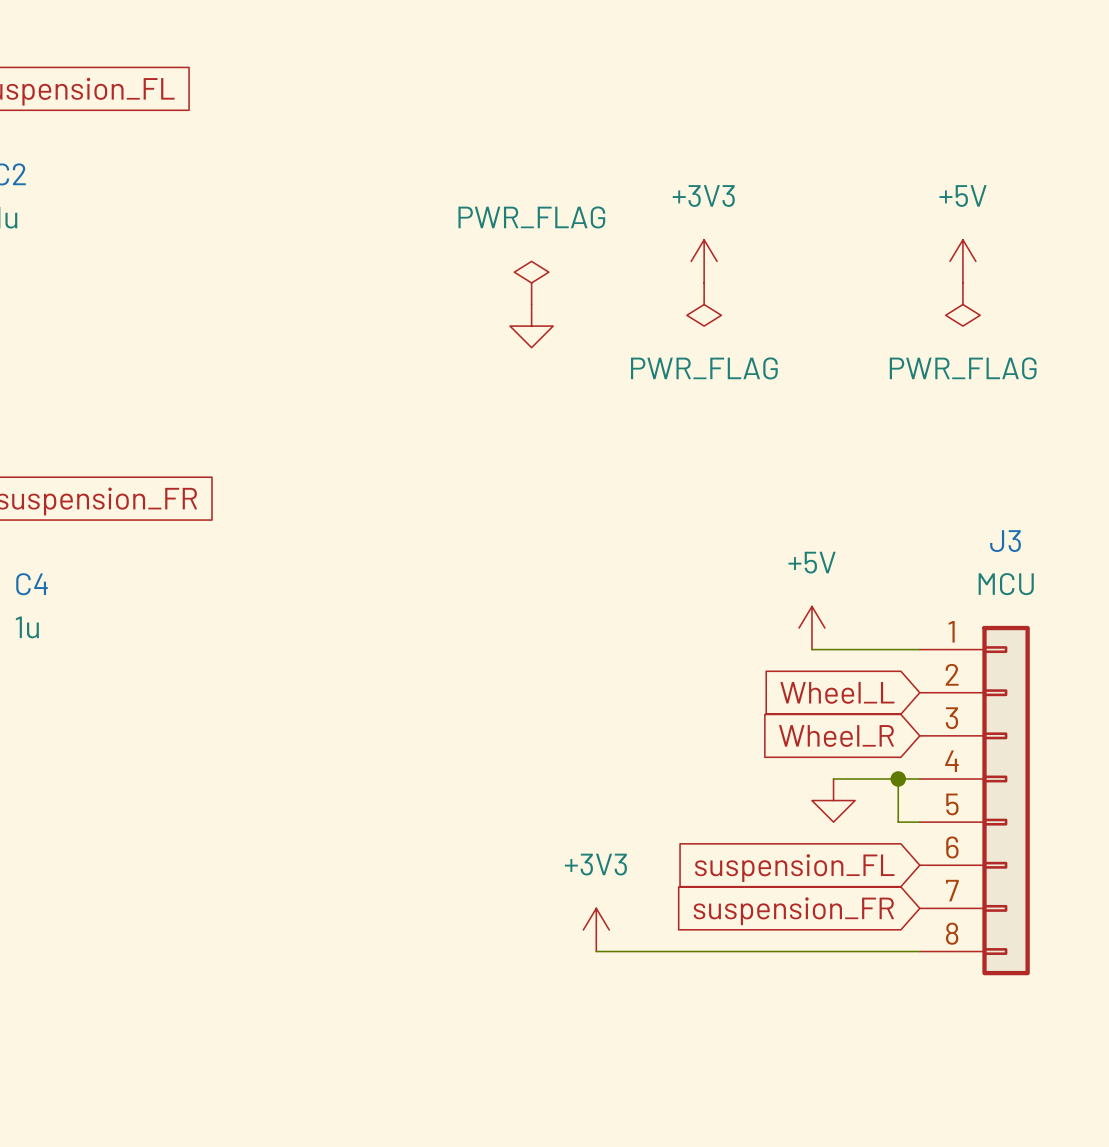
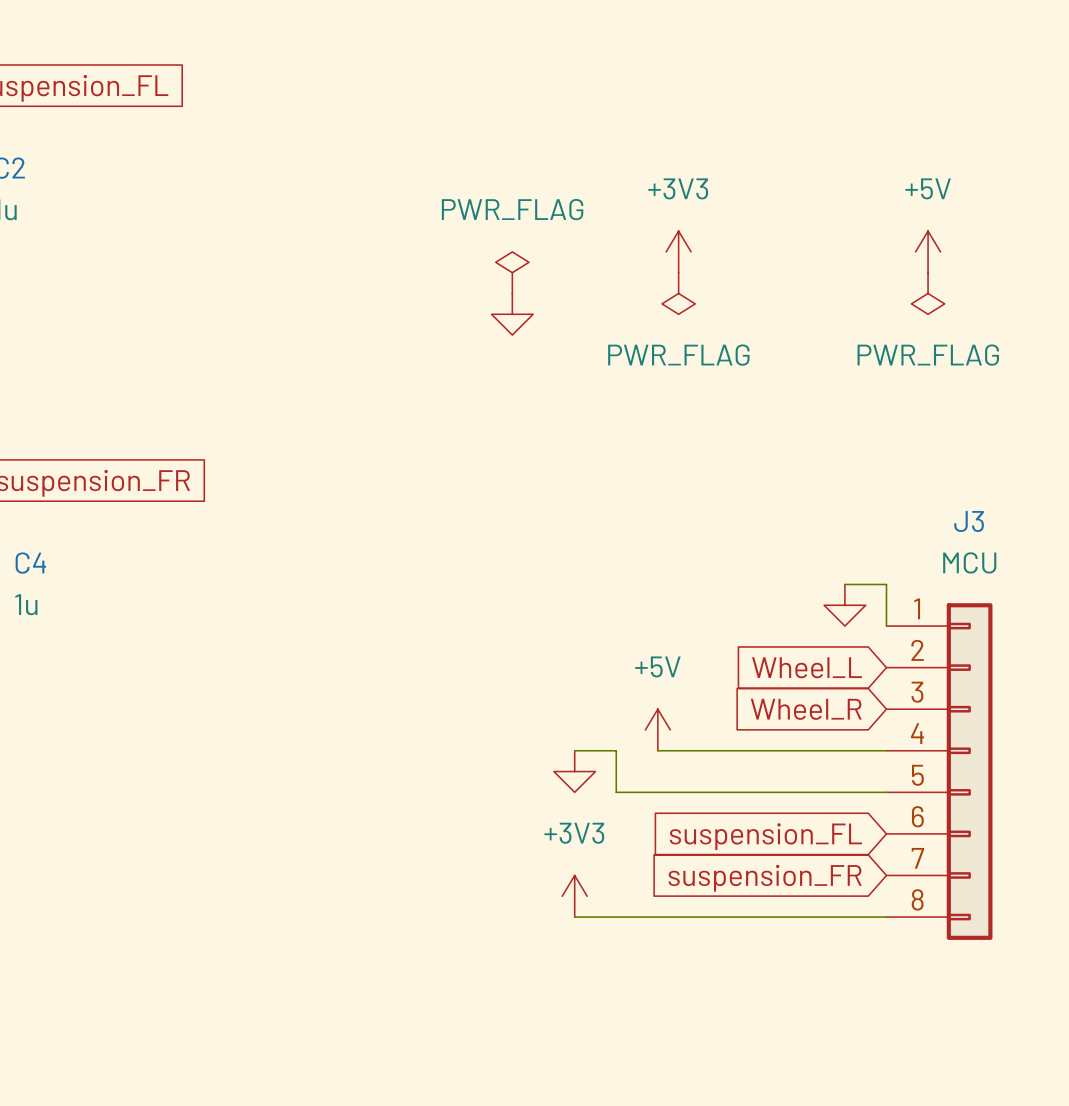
power symbol position: +5V (811, 628) -> +5V (657, 729)
power symbol: none -> (844, 605)
wire: (811, 649) (919, 649) -> (844, 584) (886, 584) (886, 626)
wire: none -> (657, 750) (803, 750)
wire: (898, 778) (898, 822) -> (574, 750) (616, 750) (616, 792) (865, 792)
junction: (898, 778) -> none
power symbol: none -> (574, 771)
power symbol: (833, 800) -> none

